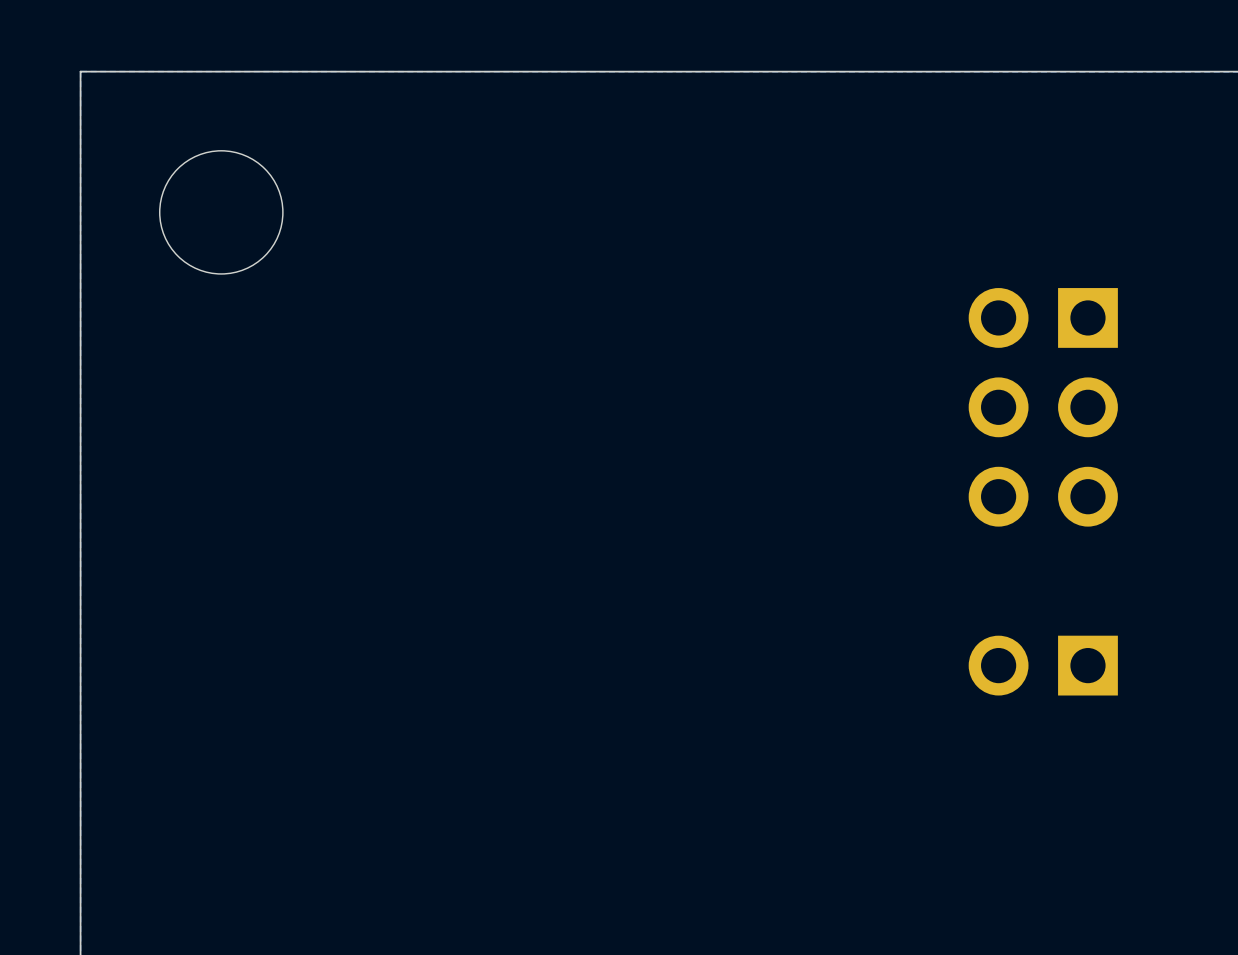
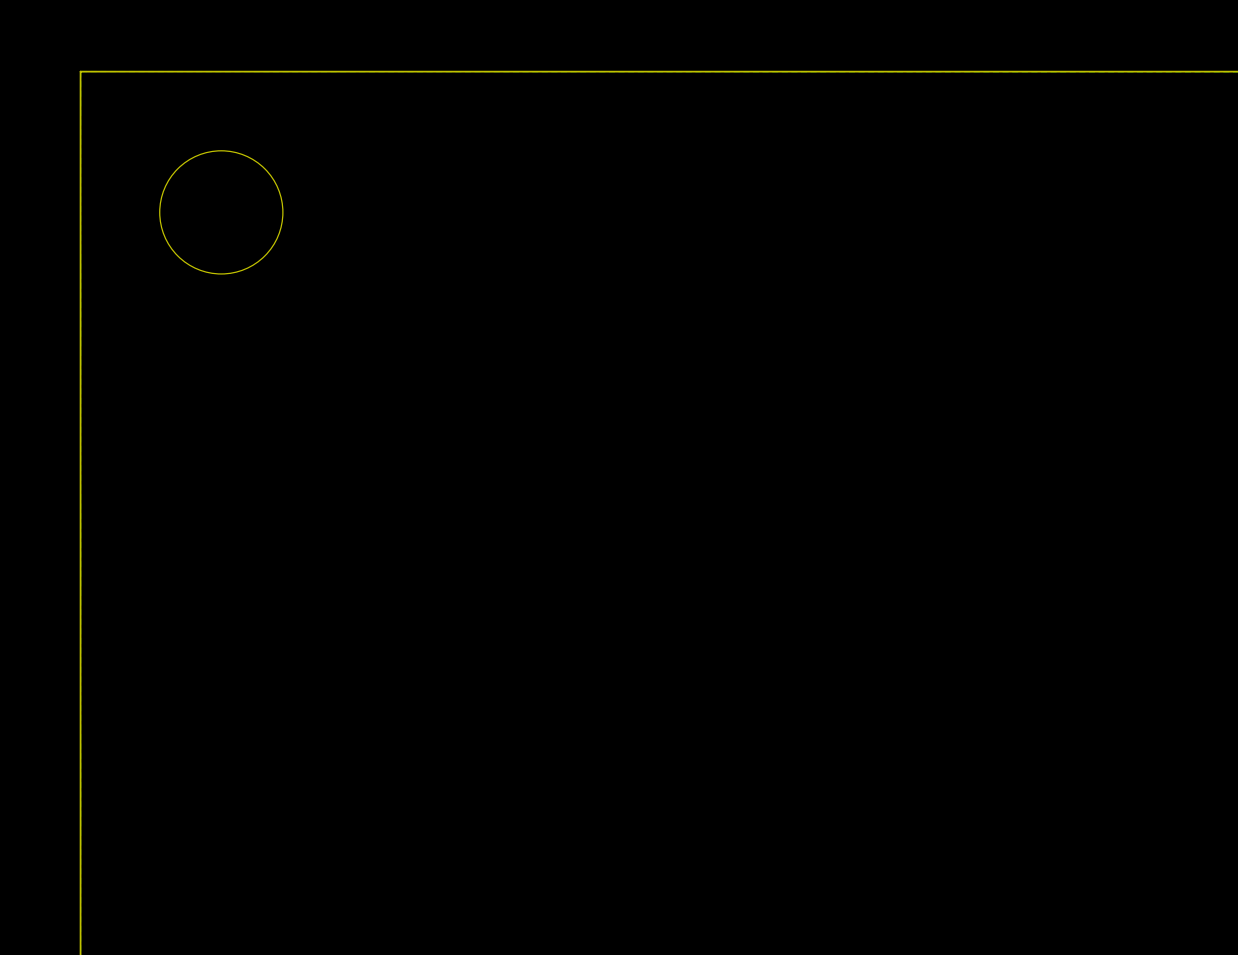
part: (1043, 407) -> none
part: (1043, 665) -> none

